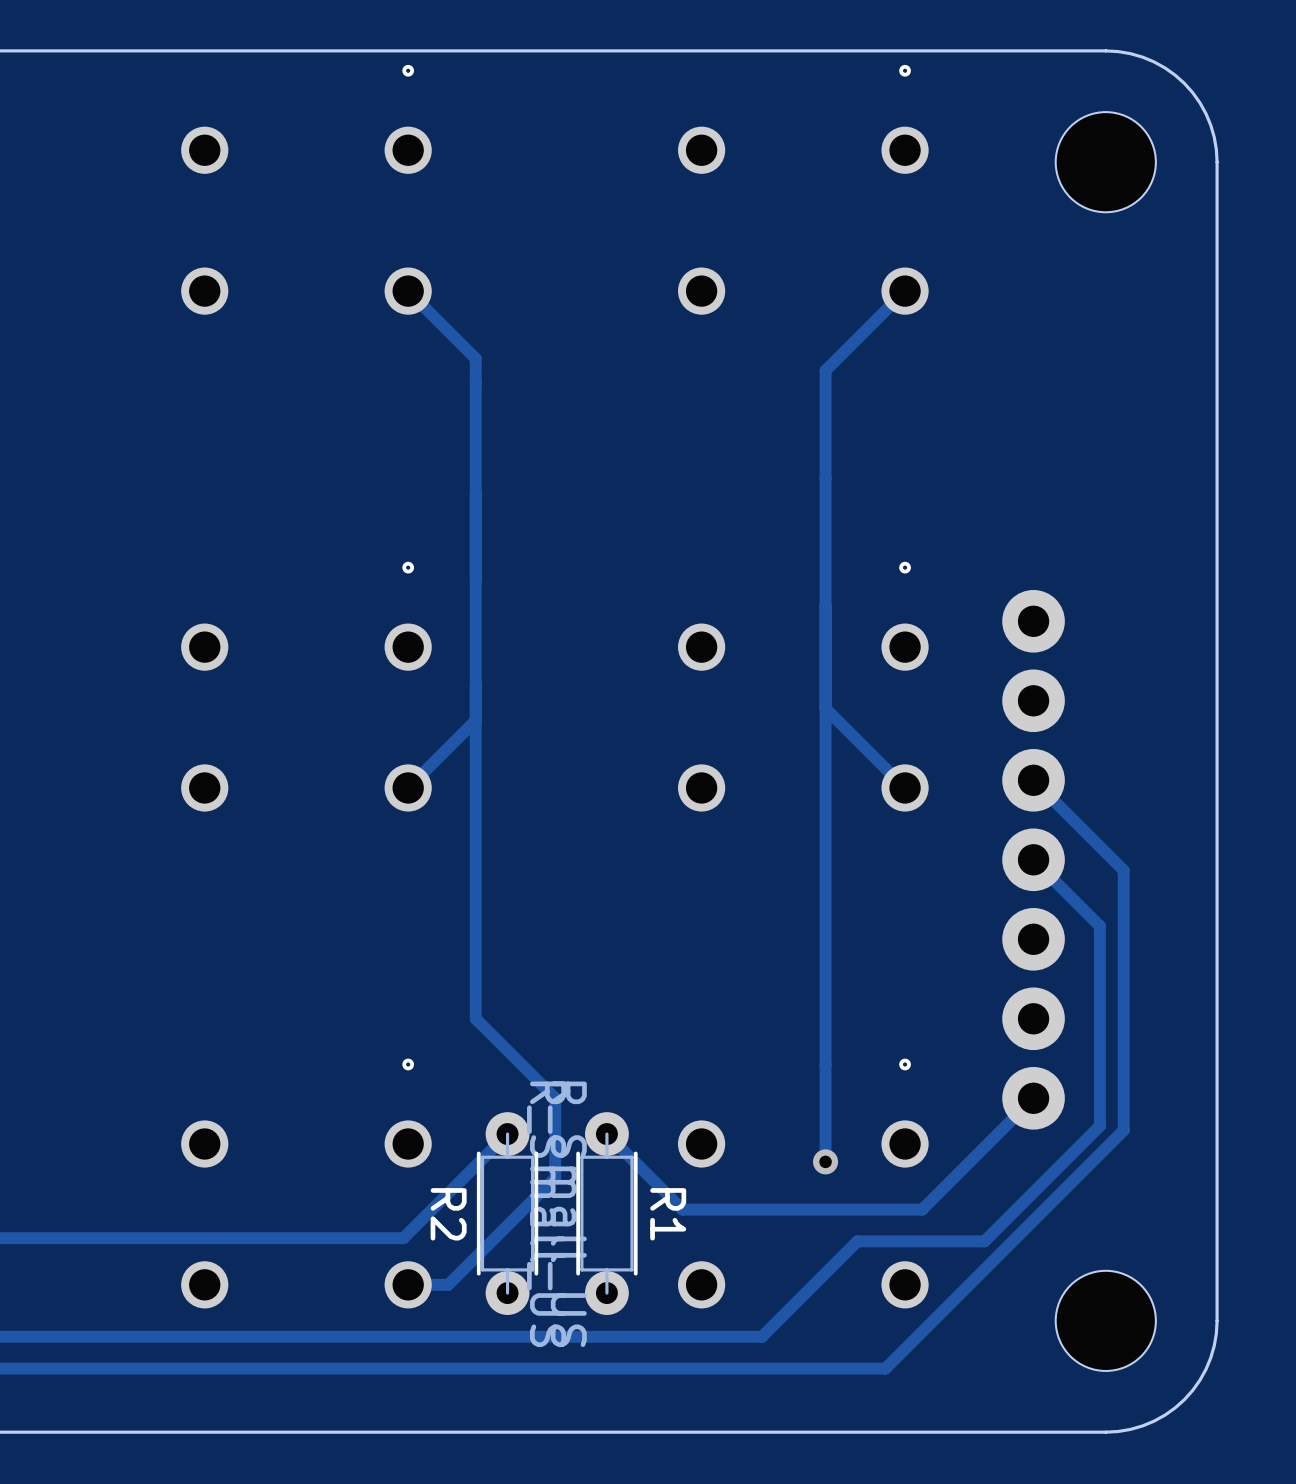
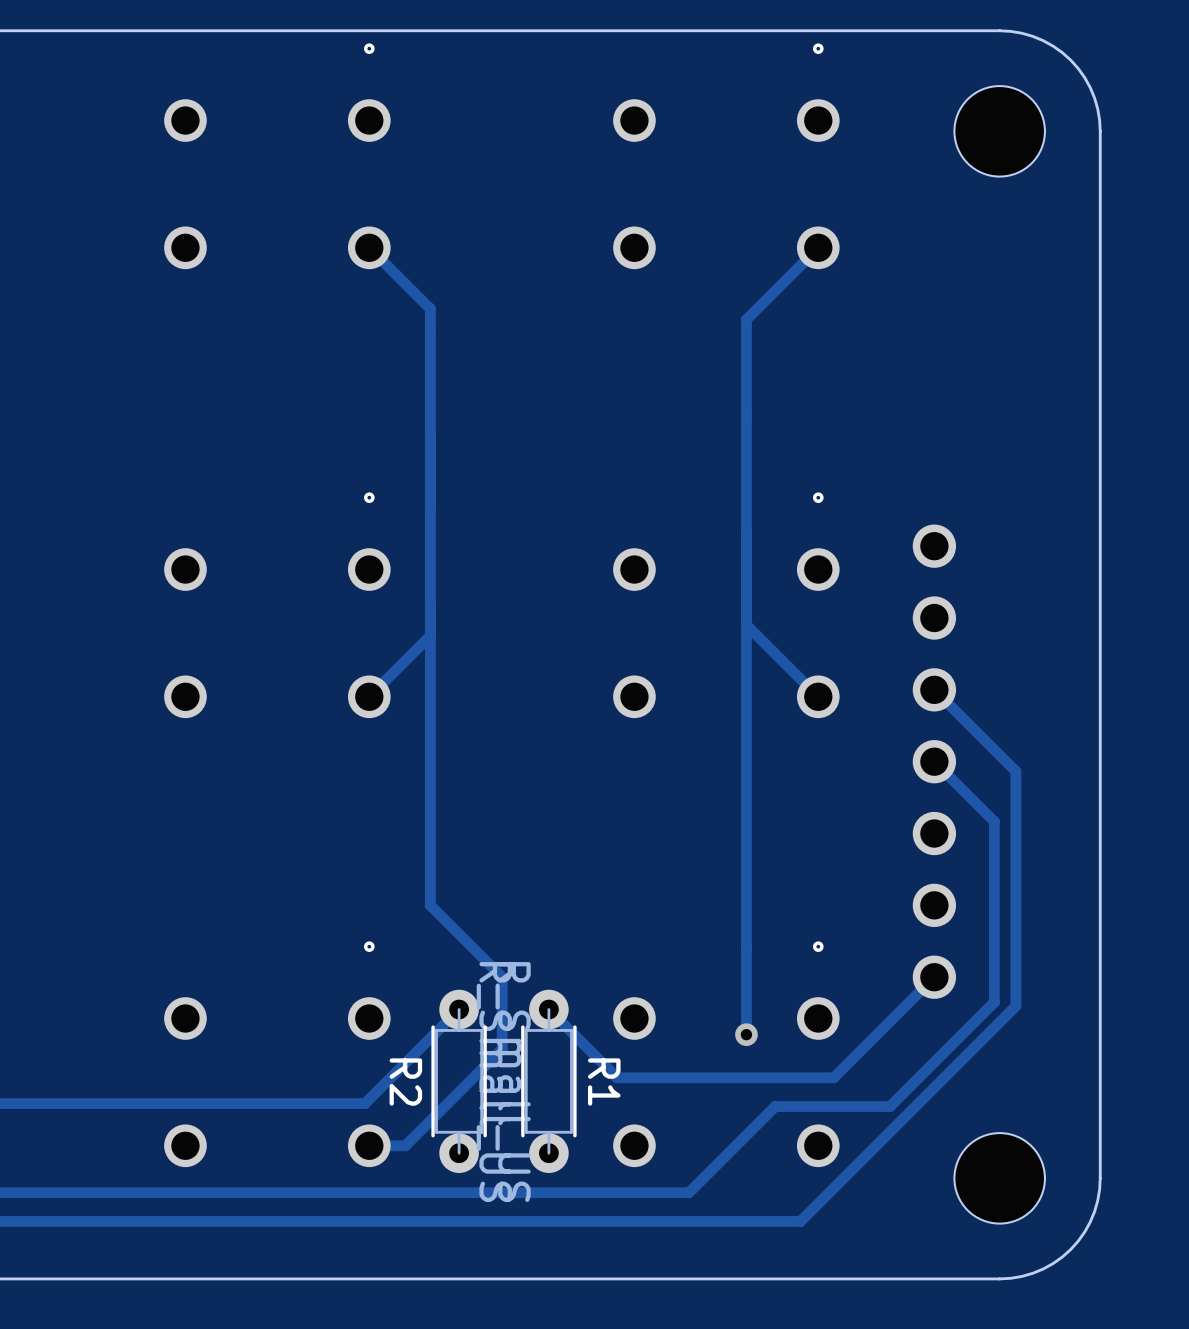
part footprint: [1002, 589, 1065, 653] -> [912, 524, 957, 568]
part footprint: [1002, 669, 1065, 733] -> [912, 596, 957, 640]
part footprint: [1002, 748, 1065, 812] -> [912, 668, 957, 712]
part footprint: [1002, 828, 1065, 892] -> [912, 740, 957, 784]
part footprint: [1002, 907, 1065, 971] -> [912, 811, 957, 856]
part footprint: [1002, 987, 1065, 1051] -> [912, 883, 957, 928]
part footprint: [1002, 1066, 1065, 1130] -> [912, 955, 957, 999]

